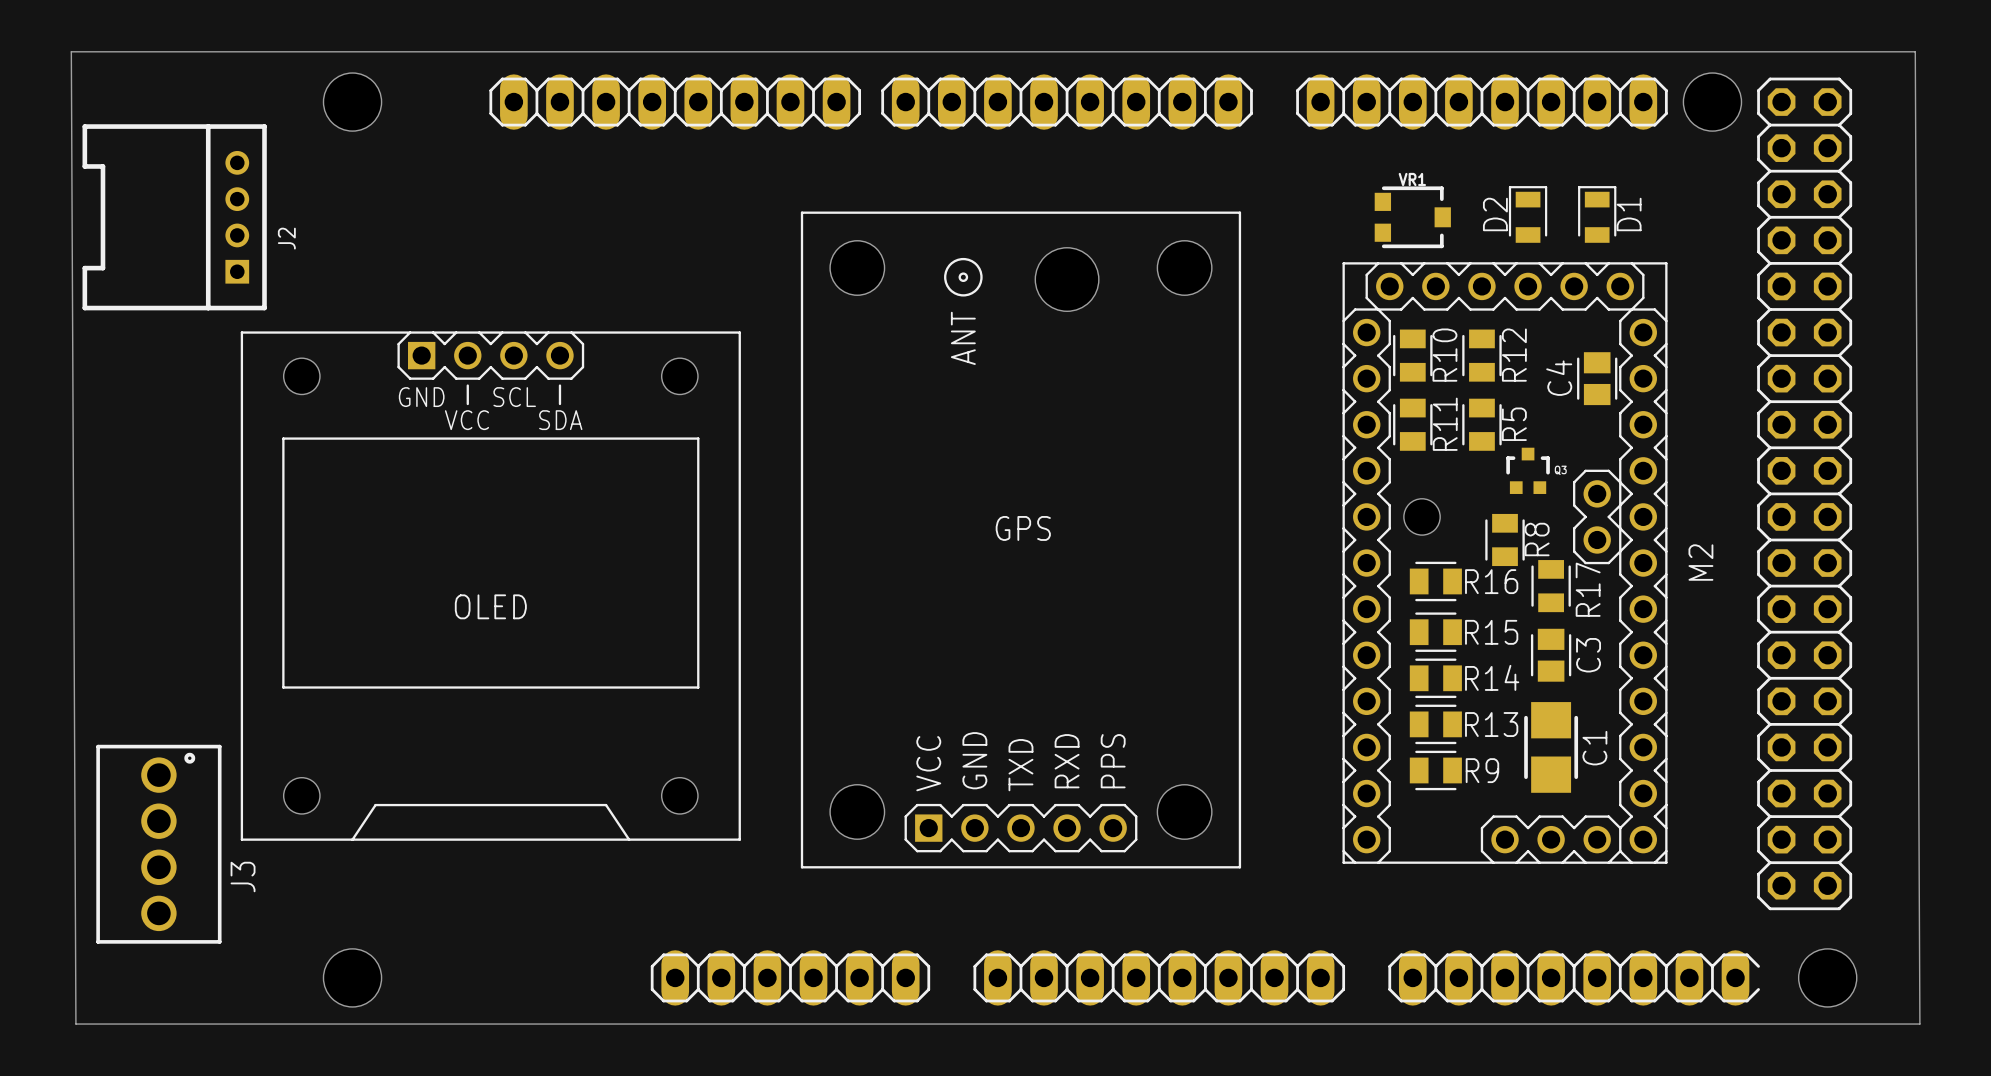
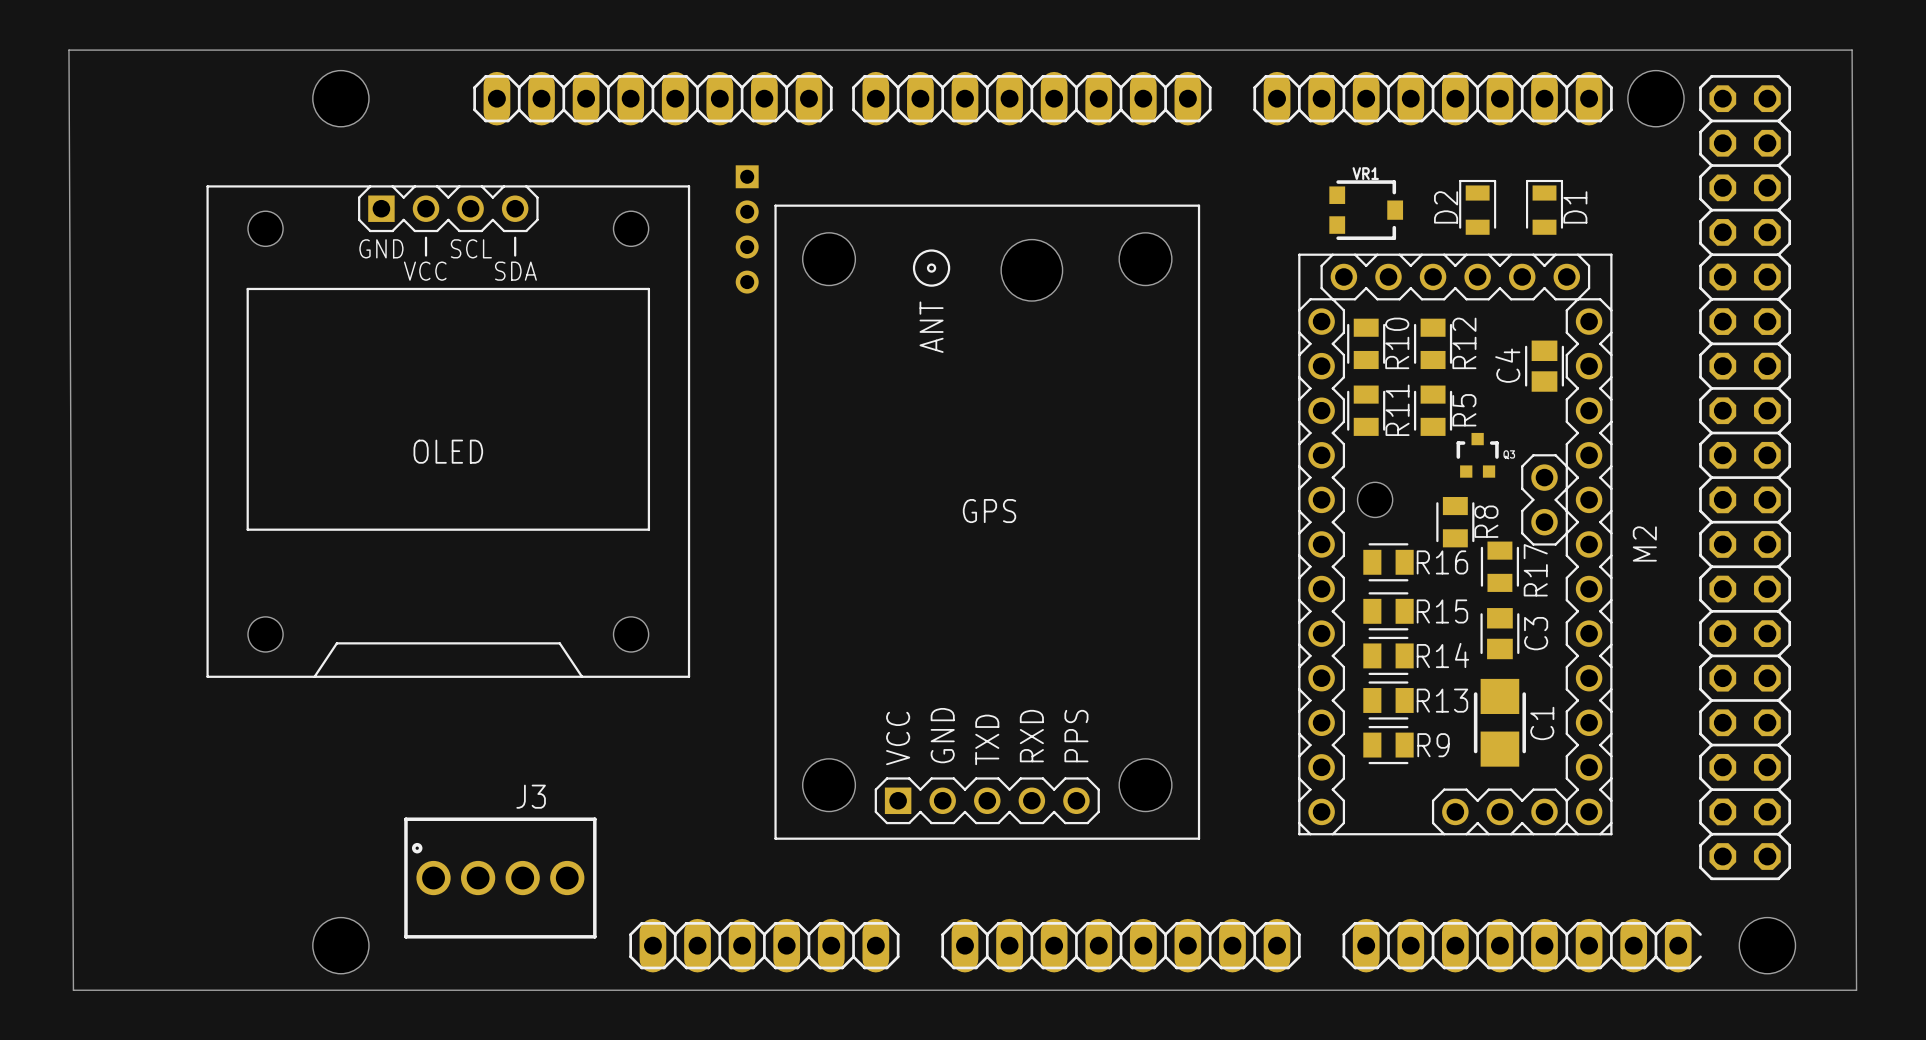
J2: (174, 217) -> none
part: none -> (747, 229)
OLED position: (490, 586) -> (448, 431)
J3 rotation: 0° (158, 844) -> 90° counterclockwise (500, 878)
J3 position: (158, 844) -> (500, 878)

